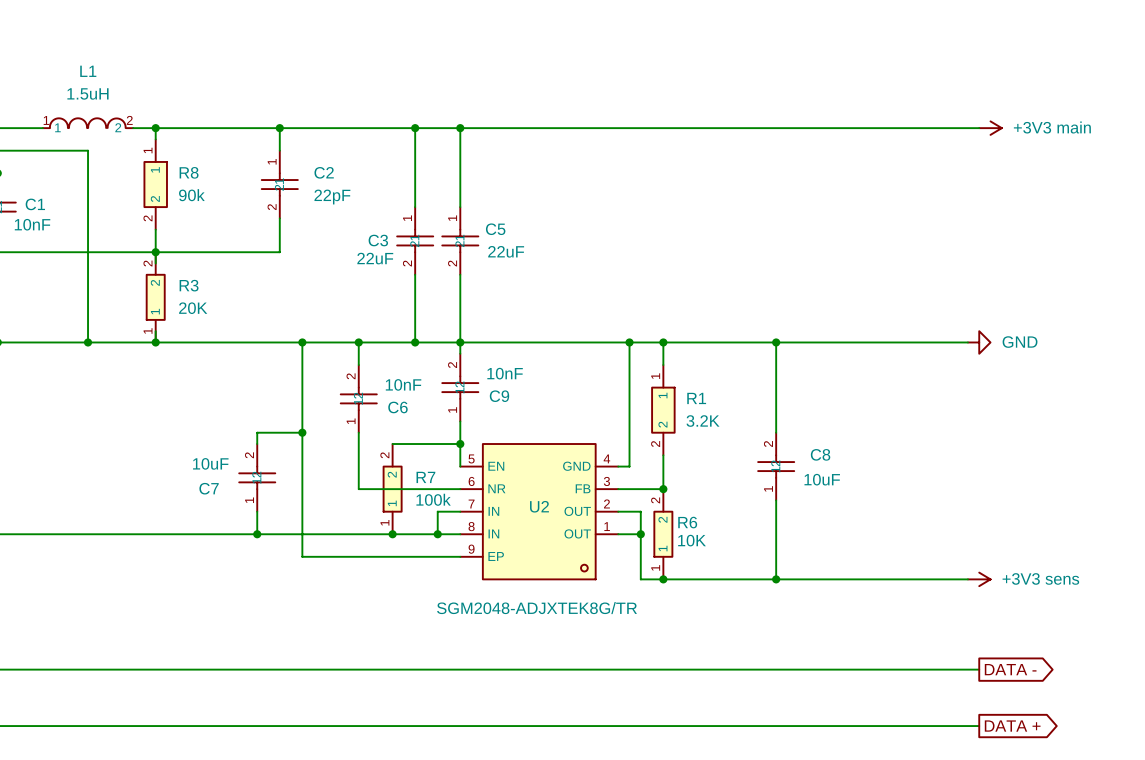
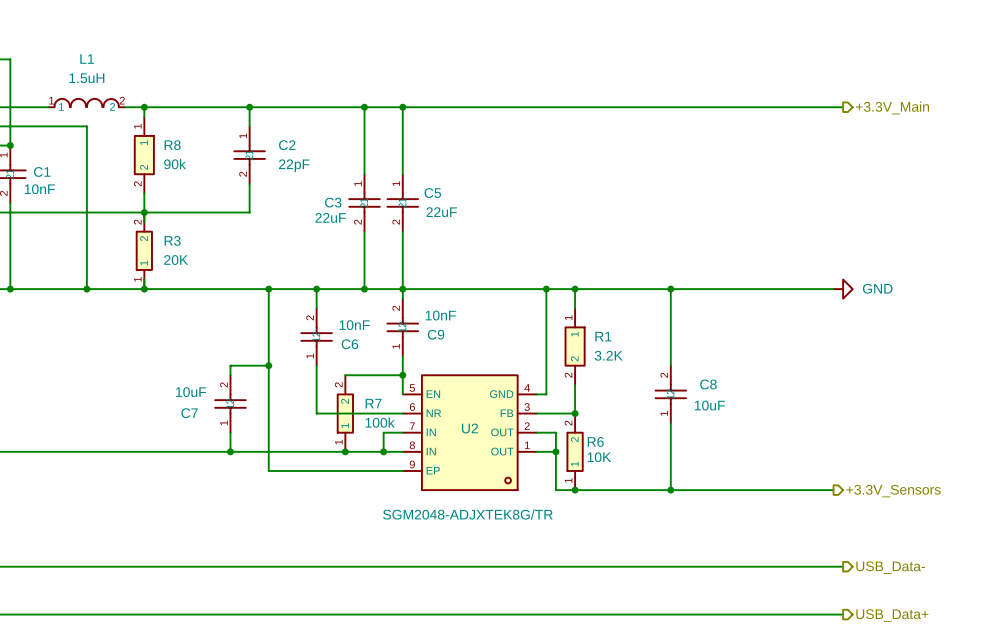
power symbol: +3V3 main (990, 128) -> none
hierarchical label: none -> +3.3V_Main (892, 108)
power symbol: +3V3 sens (979, 579) -> none
hierarchical label: none -> +3.3V_Sensors (893, 491)
global label: DATA - (1010, 669) -> none
hierarchical label: none -> USB_Data- (890, 567)
global label: DATA + (1012, 726) -> none
hierarchical label: none -> USB_Data+ (892, 615)

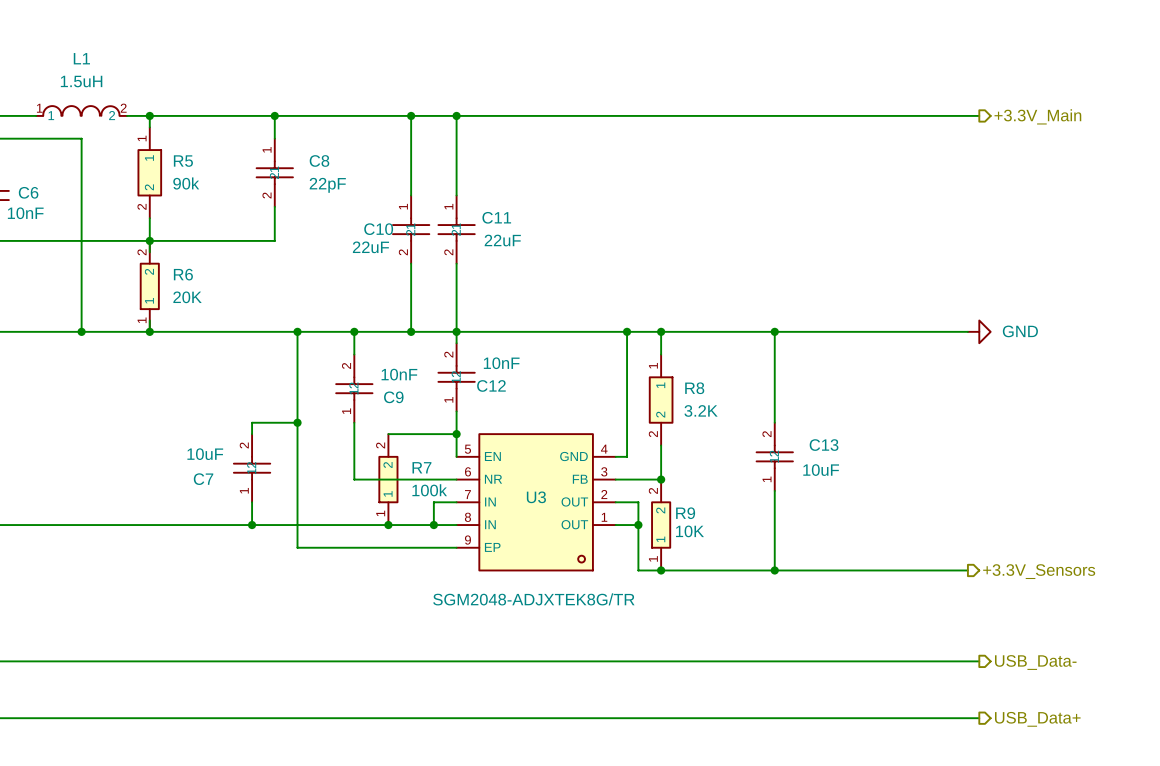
R8 name: R8 (172, 145) -> R5 (183, 161)
C2 name: C2 (287, 145) -> C8 (319, 160)
C1 name: C1 (42, 171) -> C6 (28, 192)
C5 name: C5 (432, 193) -> C11 (496, 217)
C3 name: C3 (333, 202) -> C10 (378, 229)
R3 name: R3 (172, 240) -> R6 (183, 274)
C9 name: C9 (436, 334) -> C12 (491, 385)
R1 name: R1 (603, 336) -> R8 (694, 388)
C6 name: C6 (349, 344) -> C9 (393, 397)
C8 name: C8 (708, 384) -> C13 (824, 445)
U2 name: U2 (469, 428) -> U3 (536, 497)
R6 name: R6 (595, 441) -> R9 (685, 513)

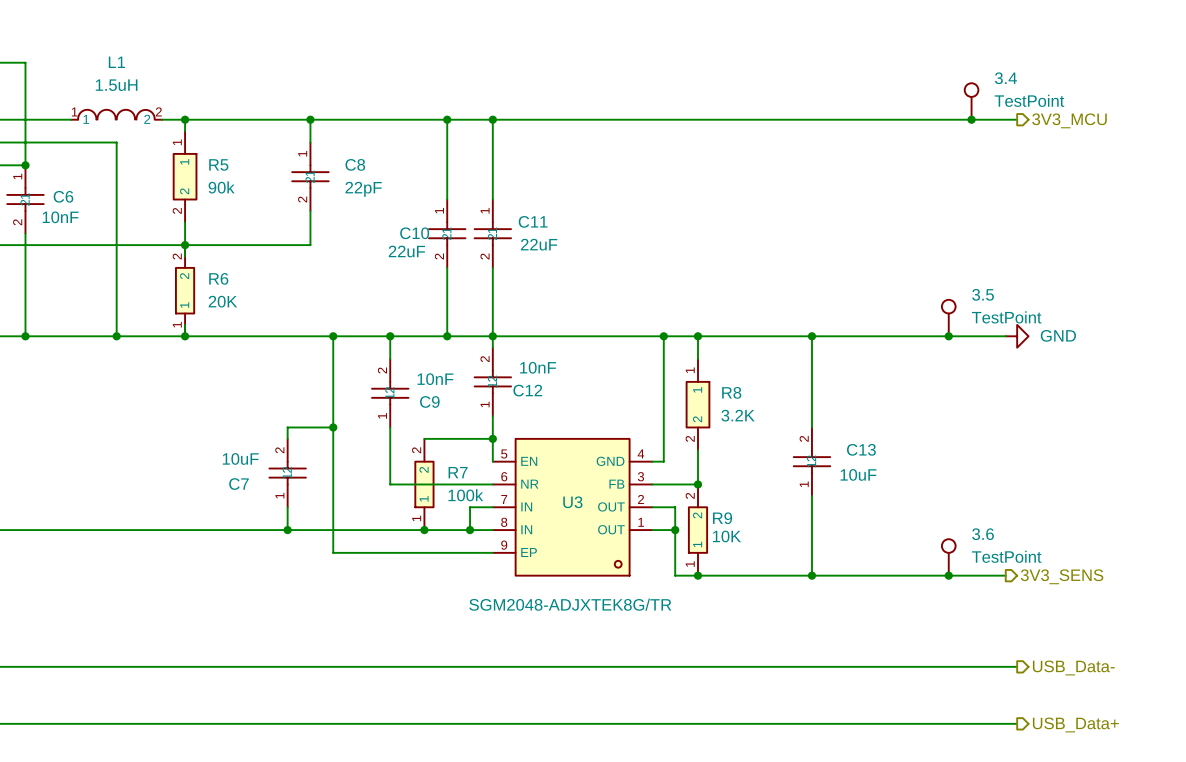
3.4: none -> TestPoint (971, 101)
junction: none -> (971, 119)
hierarchical label: +3.3V_Main (1037, 116) -> 3V3_MCU (1069, 120)
3.5: none -> TestPoint (948, 318)
junction: none -> (948, 336)
3.6: none -> TestPoint (948, 557)
junction: none -> (948, 575)
hierarchical label: +3.3V_Sensors (1039, 571) -> 3V3_SENS (1062, 576)

